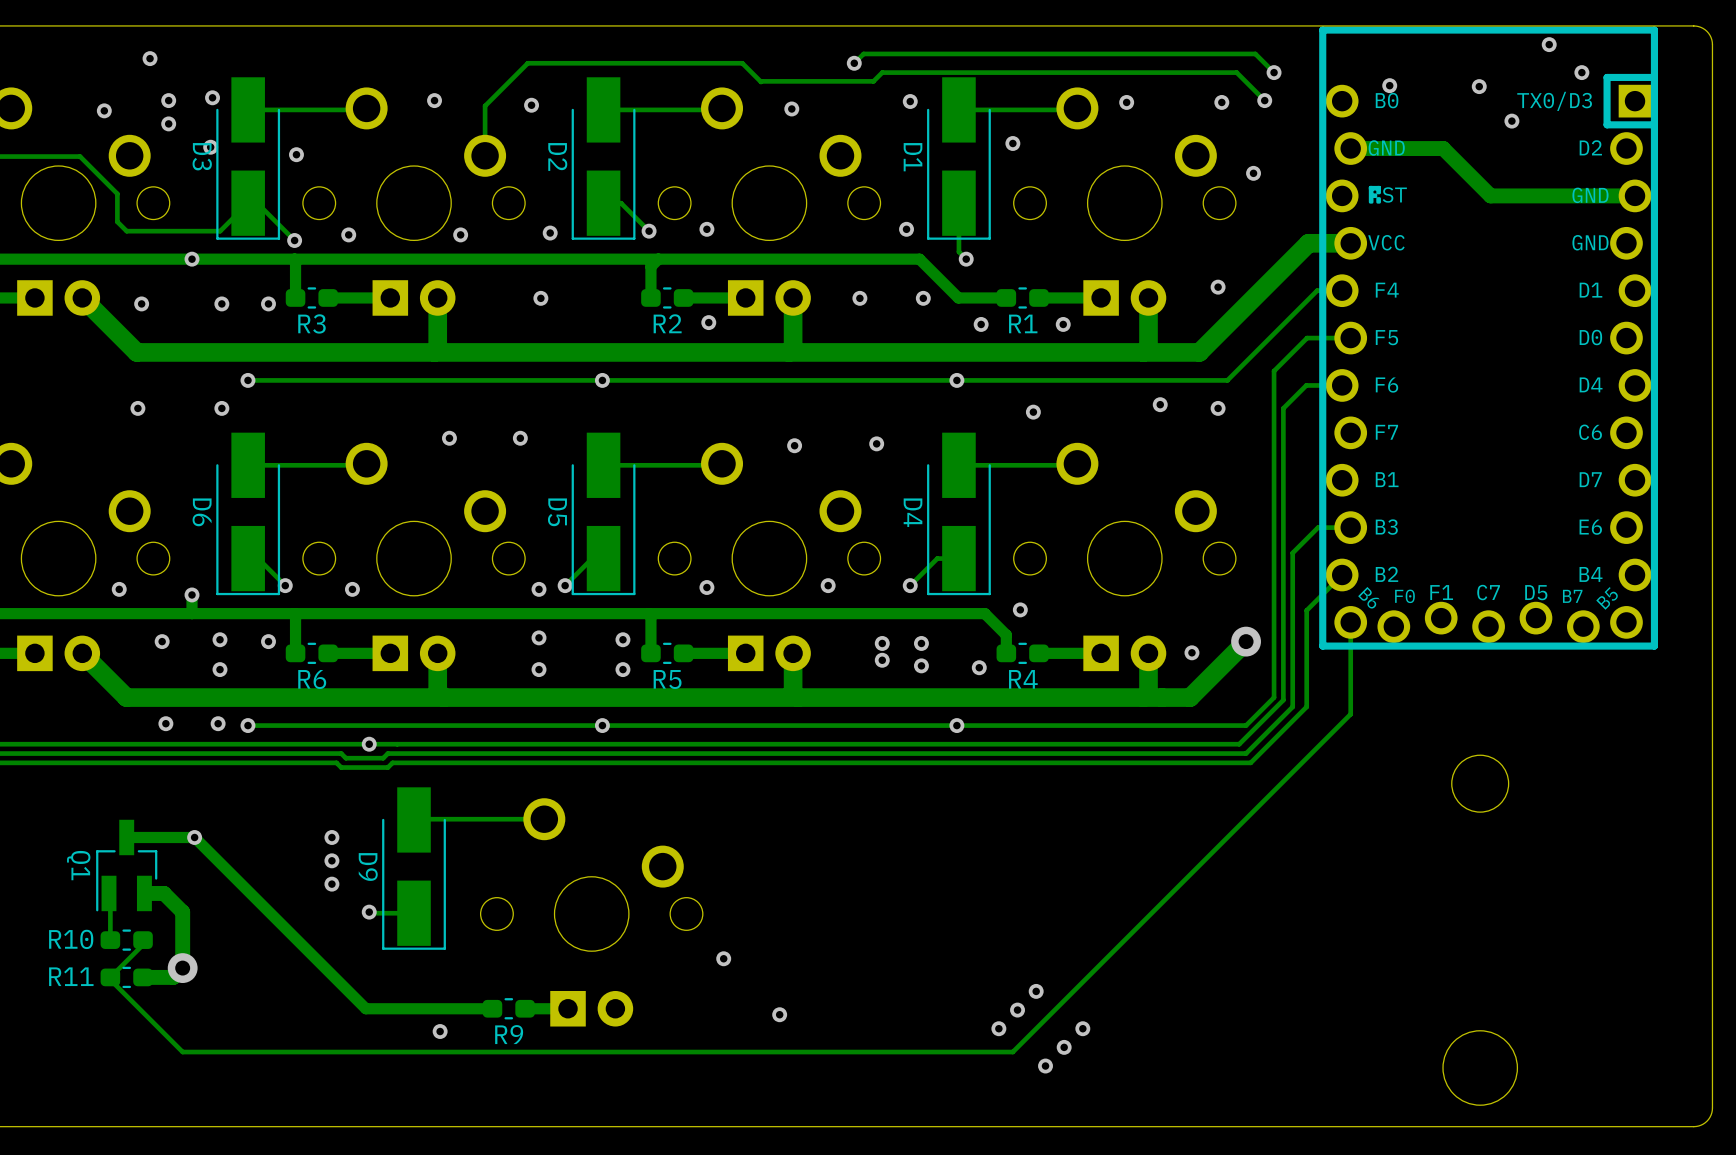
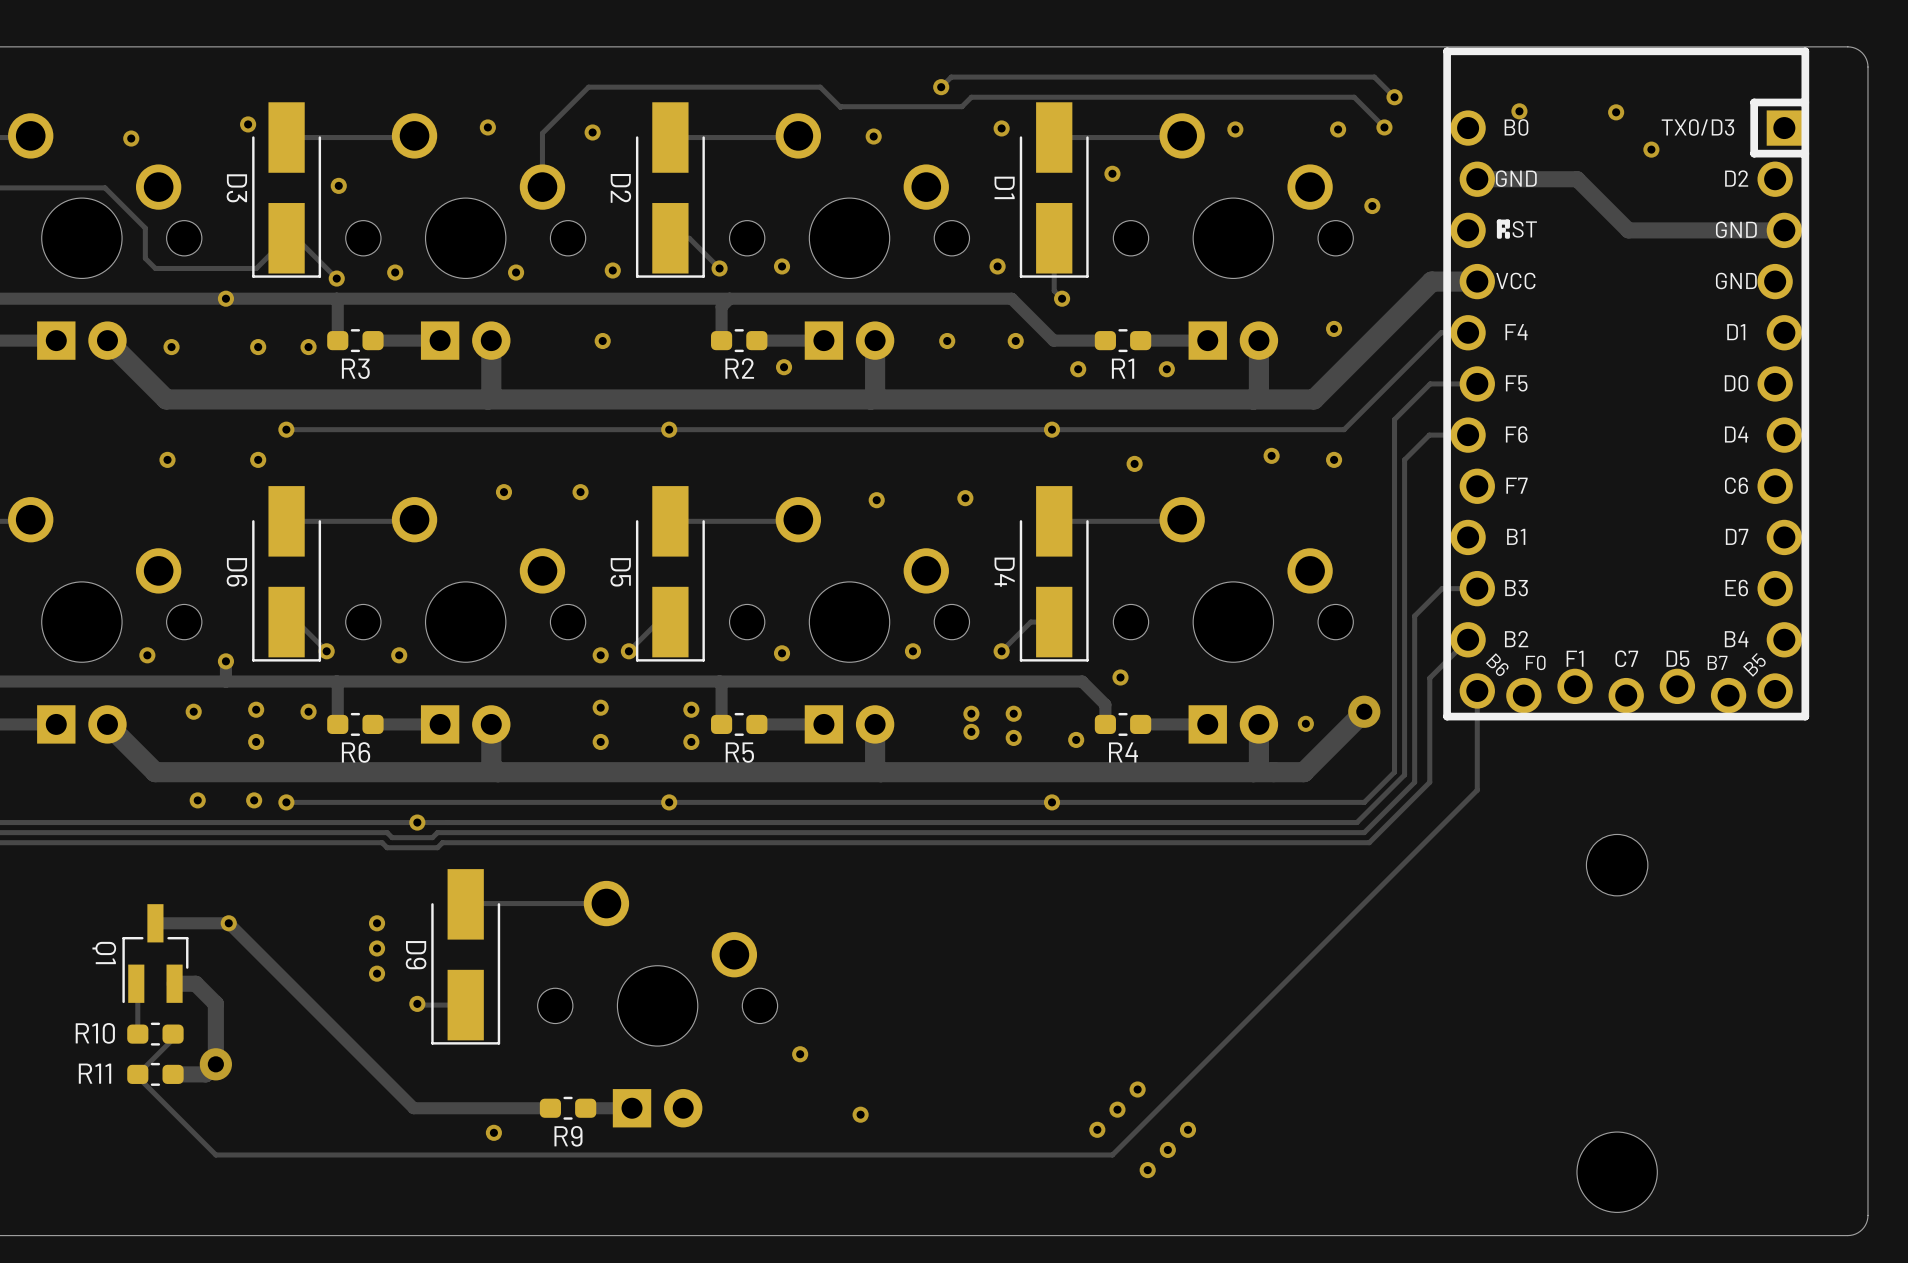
via: (1549, 44) -> none
via: (150, 58) -> none
via: (1581, 72) -> none
via: (168, 100) -> none
via: (168, 123) -> none
via: (210, 147) -> none

